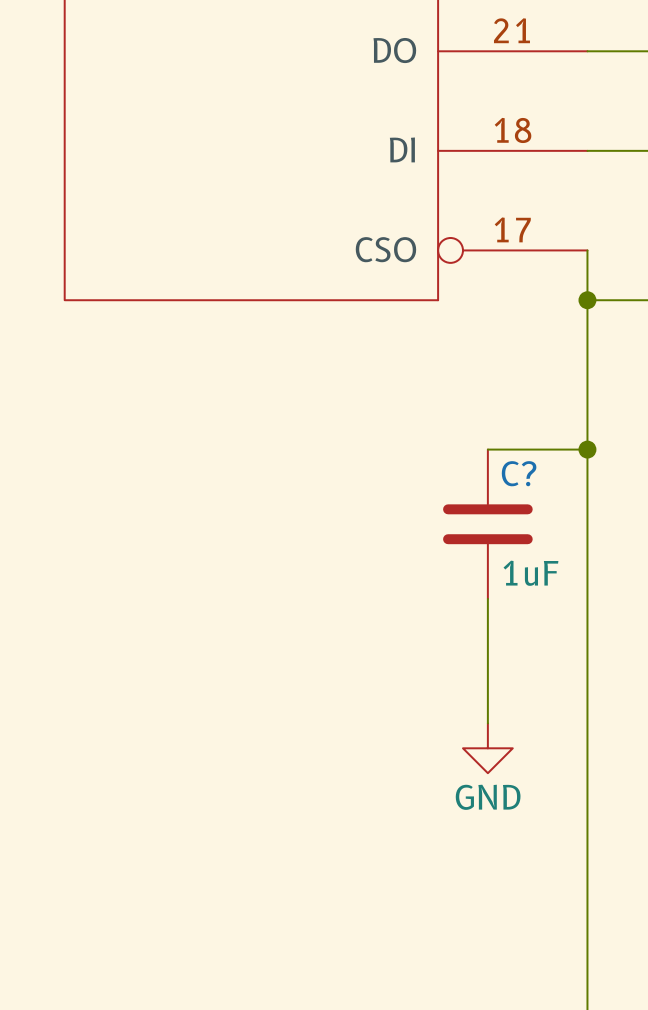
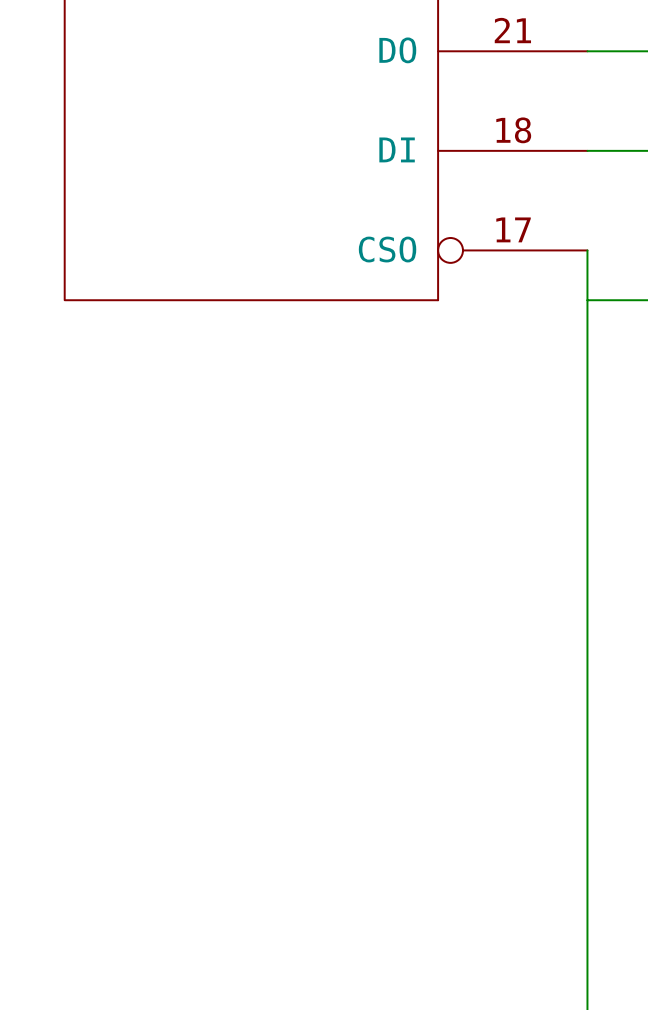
junction: (587, 300) -> none
wire: (487, 449) (587, 449) -> none
junction: (587, 449) -> none
C?: 1uF (487, 524) -> none
wire: (487, 598) (487, 723) -> none
power symbol: GND (487, 748) -> none

